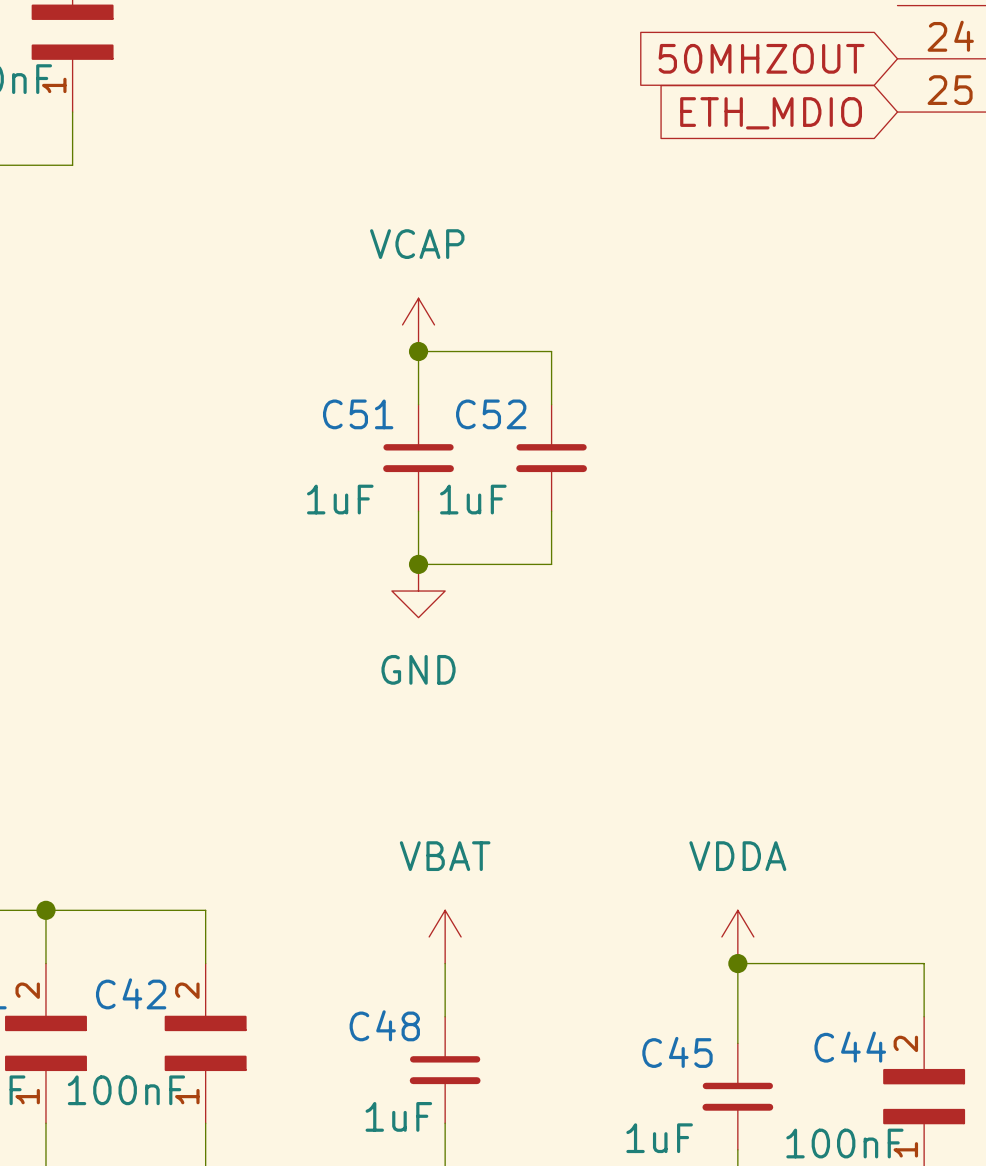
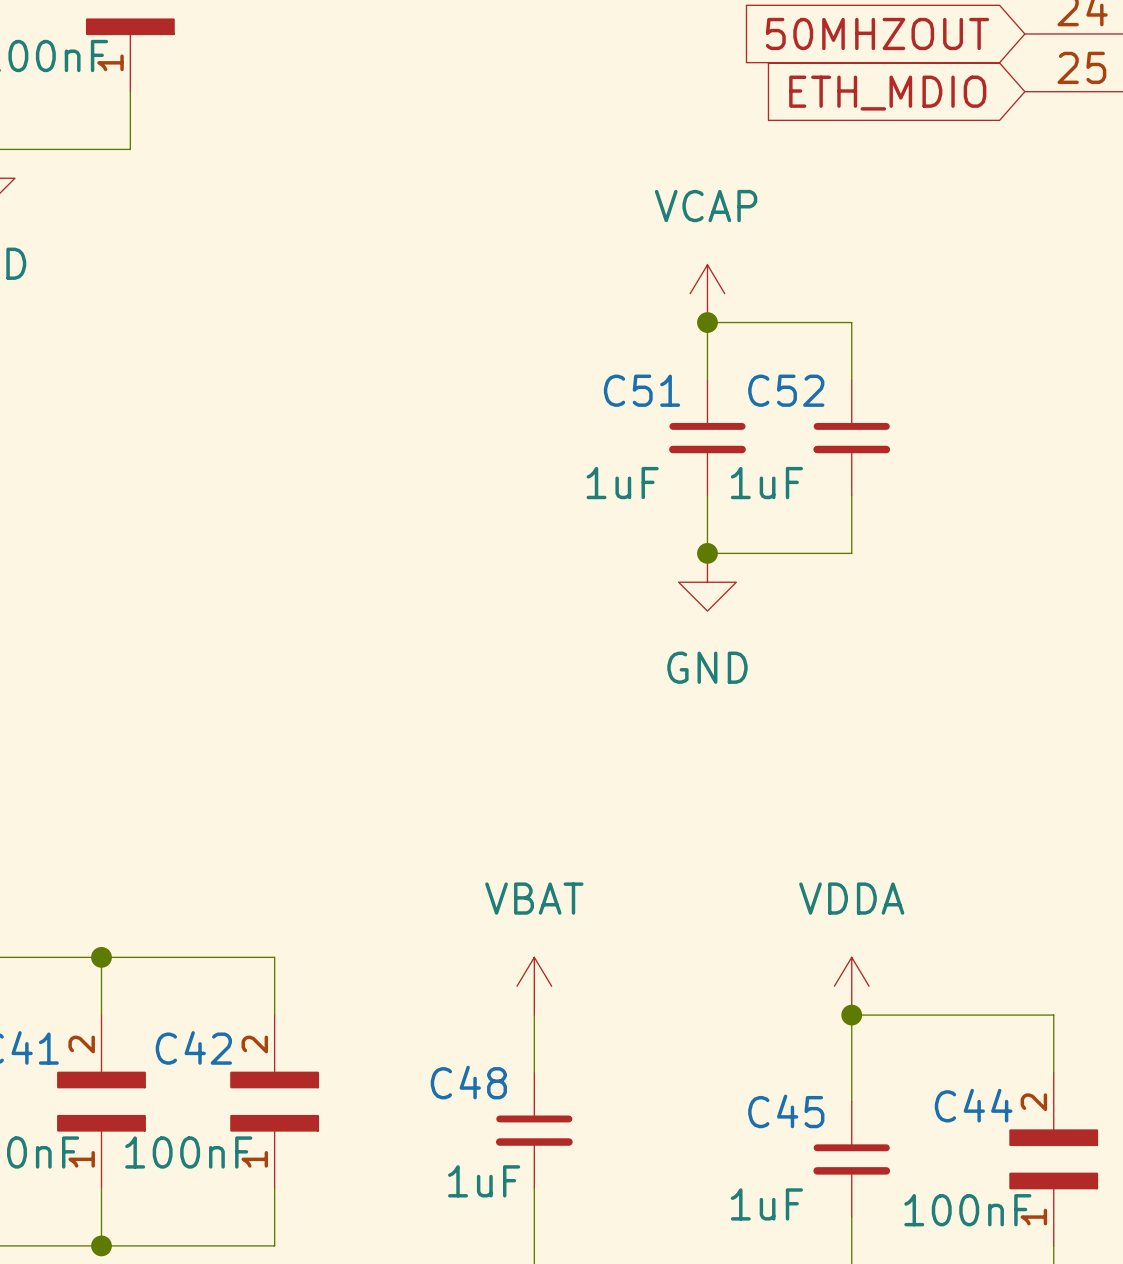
power symbol position: VCAP (418, 324) -> VCAP (707, 293)
junction: none -> (707, 322)
junction: (418, 351) -> none
wire: (418, 404) (418, 351) (551, 351) (551, 404) -> (707, 380) (707, 322) (851, 322) (851, 380)
C51 position: (418, 457) -> (707, 437)
C52 position: (551, 457) -> (851, 437)
wire: (418, 511) (418, 564) (551, 564) (551, 511) -> (707, 495) (707, 553) (851, 553) (851, 495)
junction: none -> (707, 553)
junction: (418, 564) -> none
power symbol position: GND (418, 591) -> GND (707, 582)

